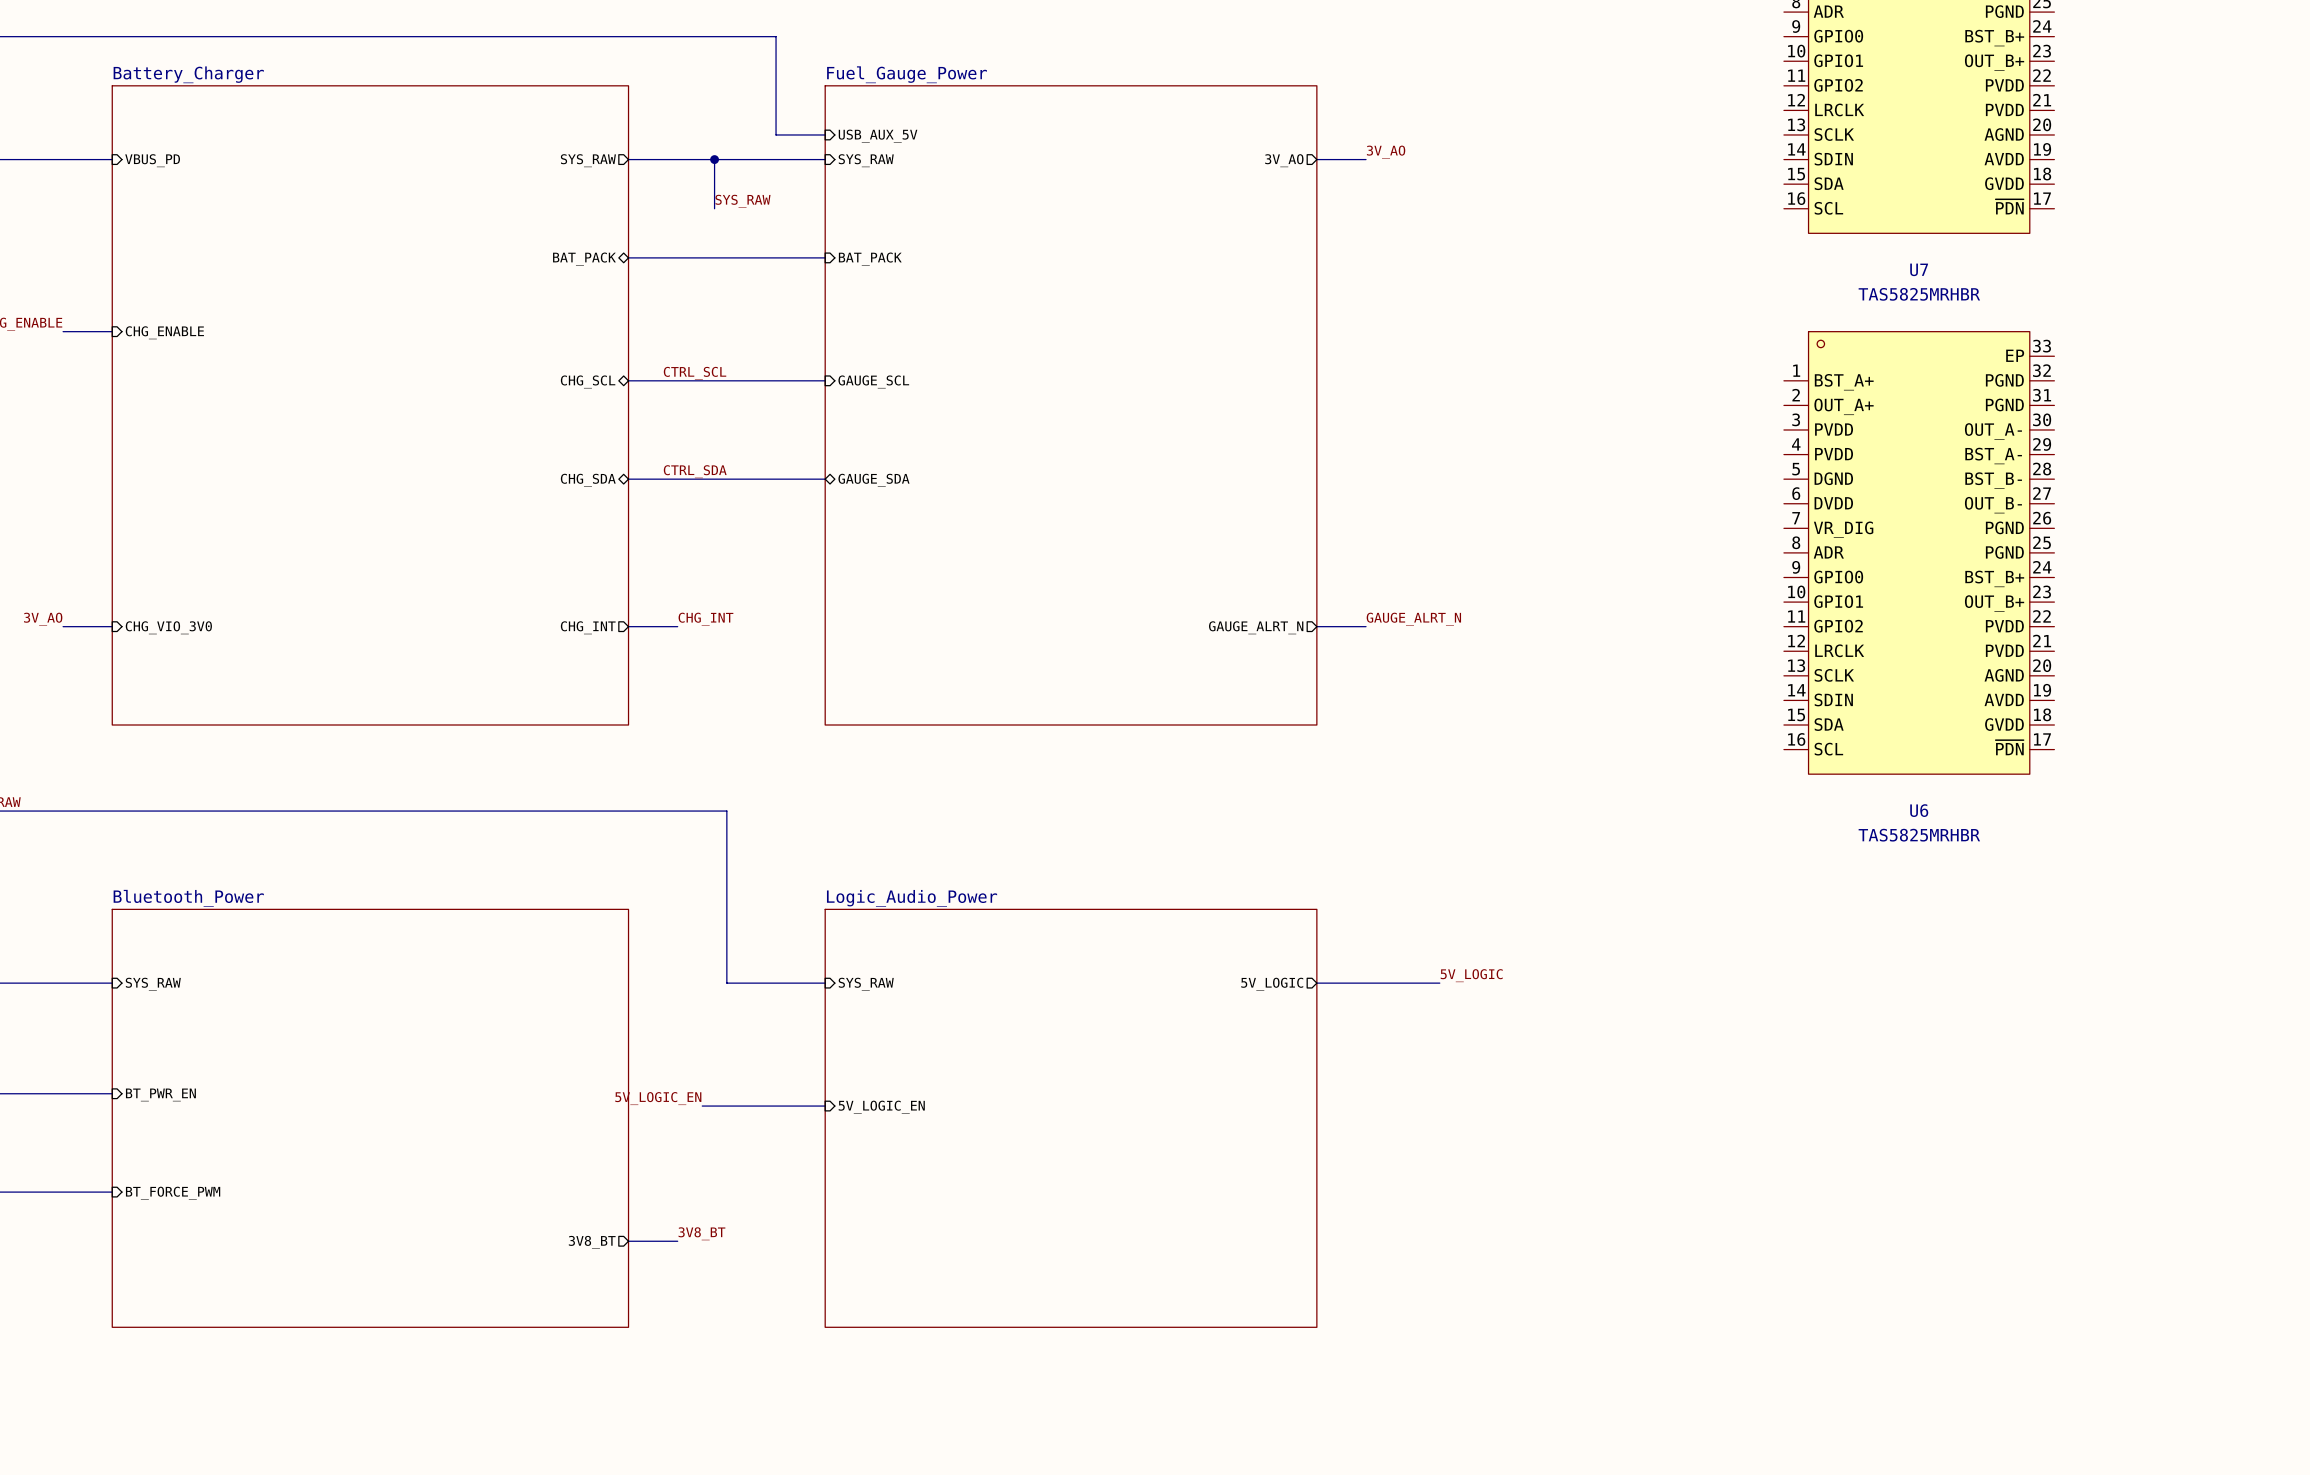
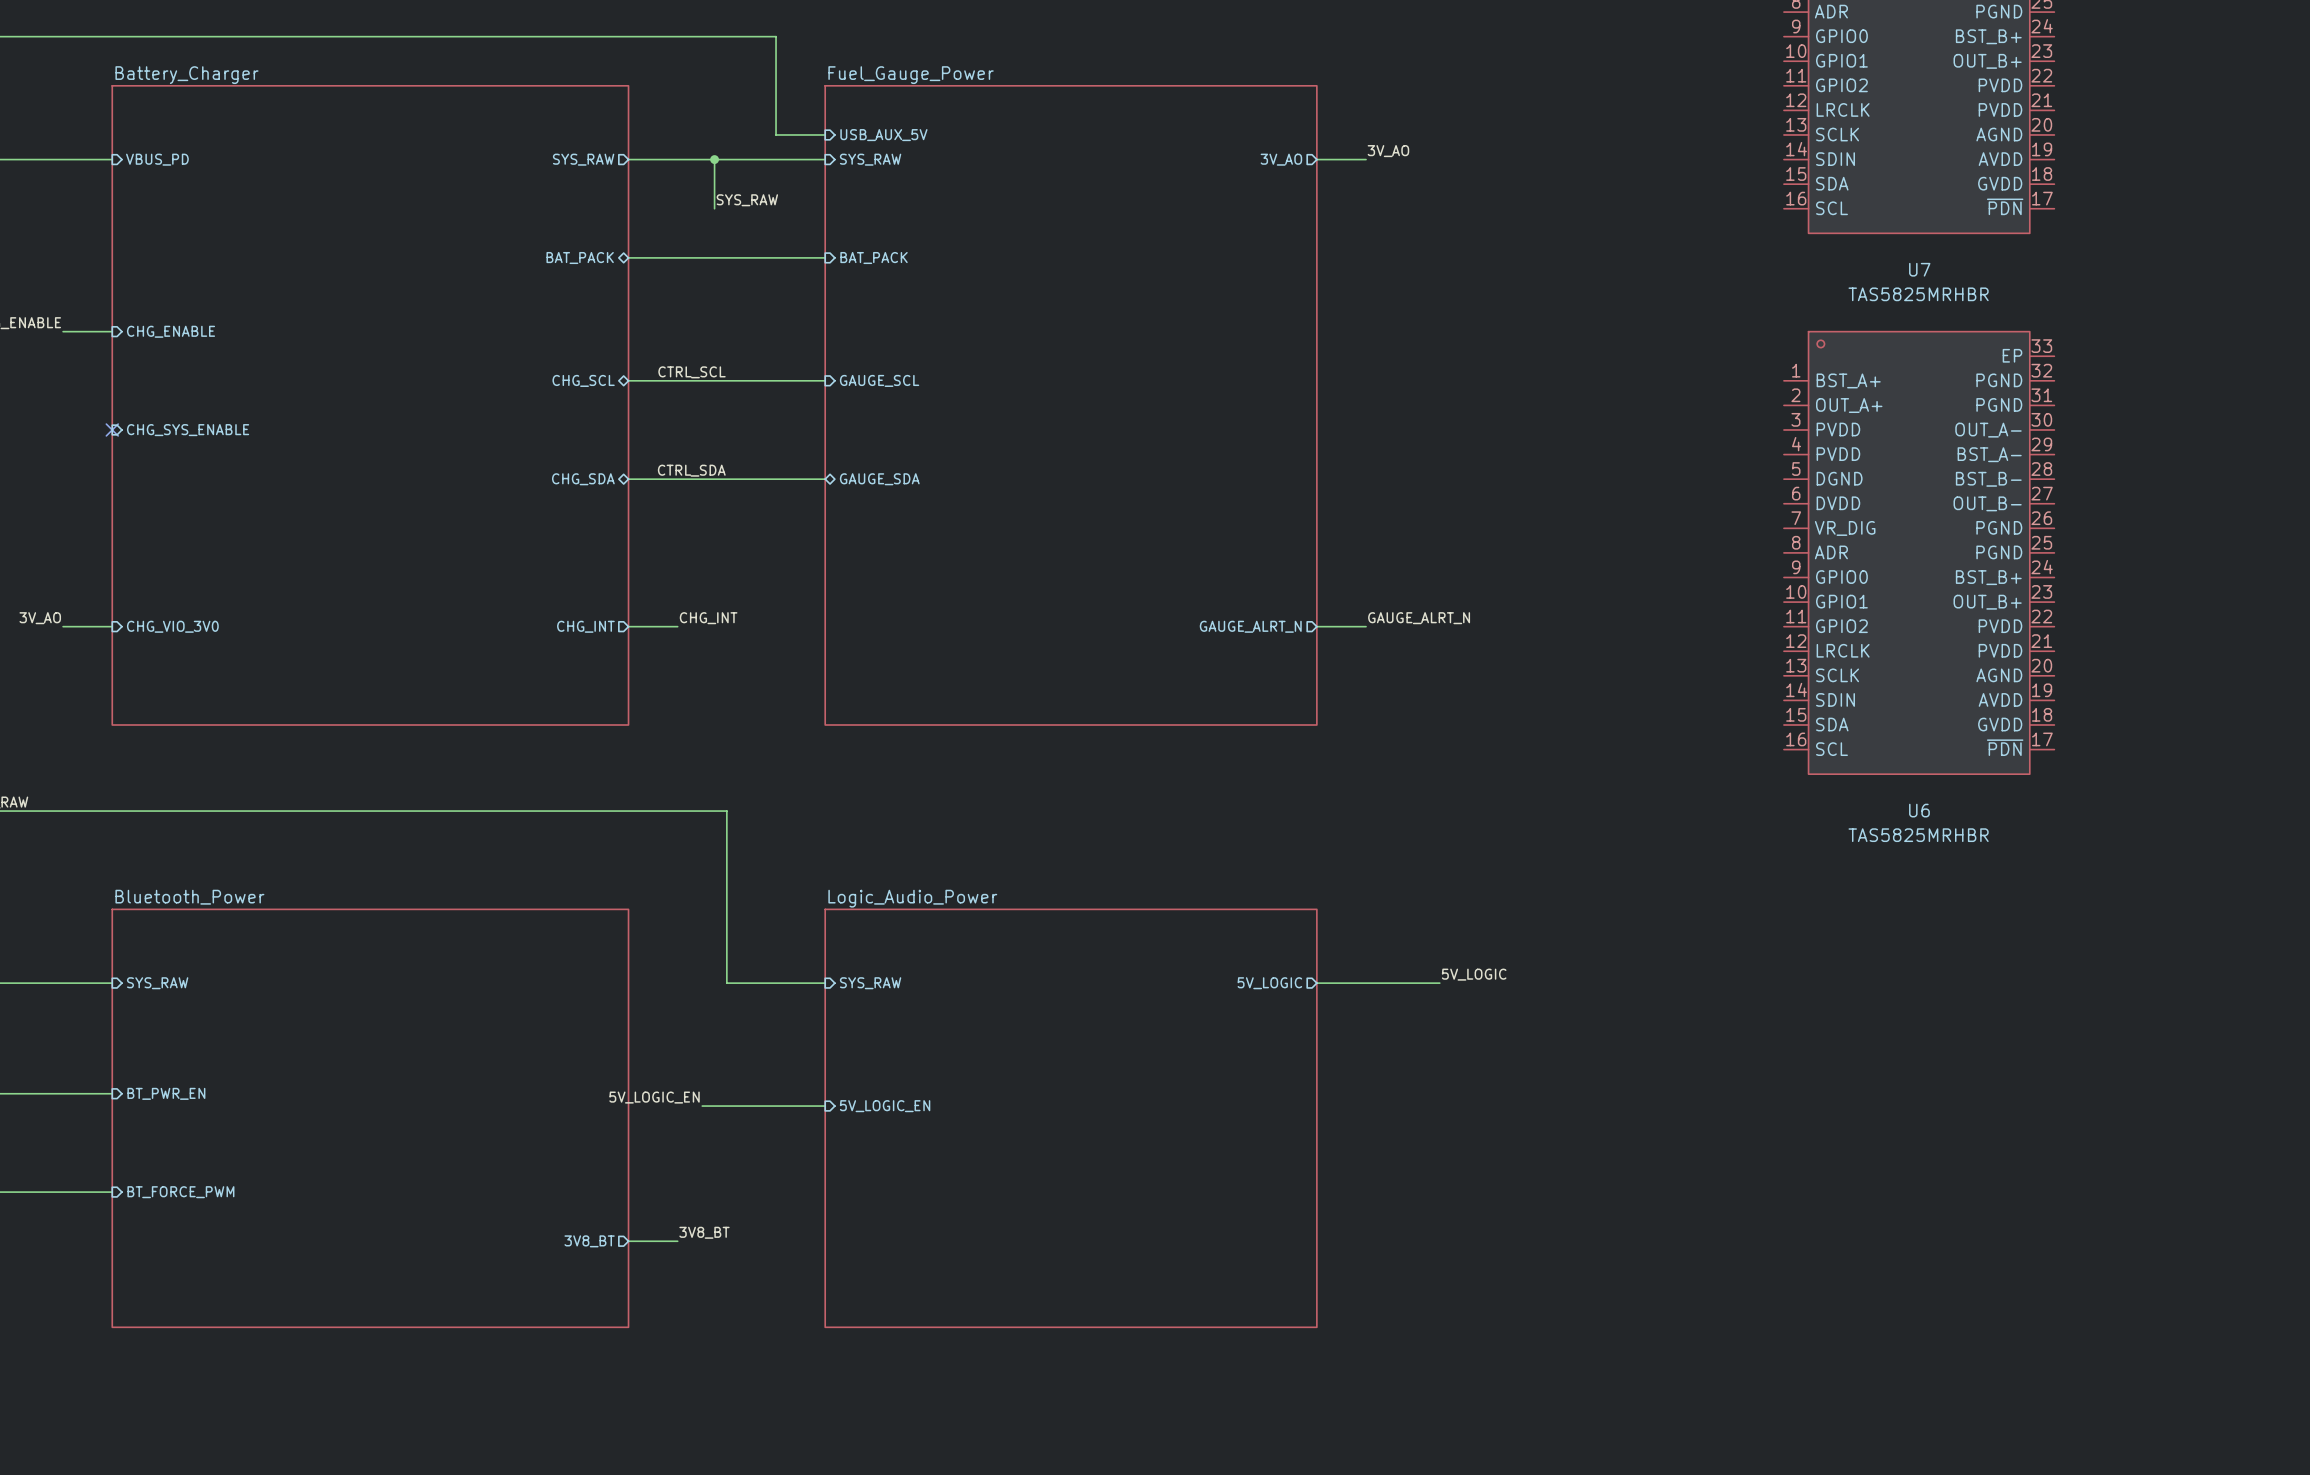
no-connect mark: none -> (112, 429)
sheet pin: none -> CHG_SYS_ENABLE (188, 430)

